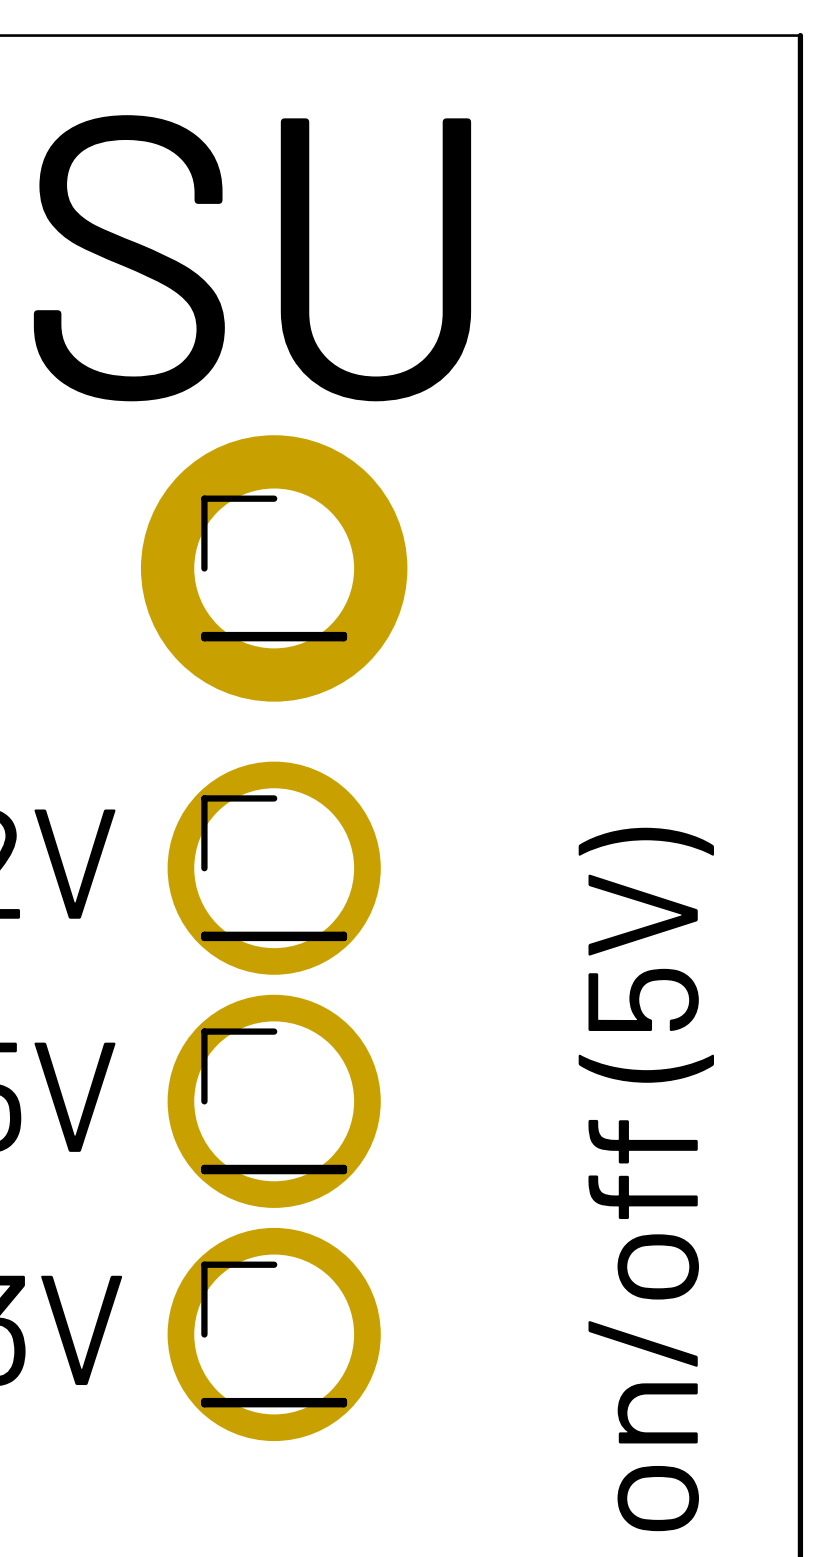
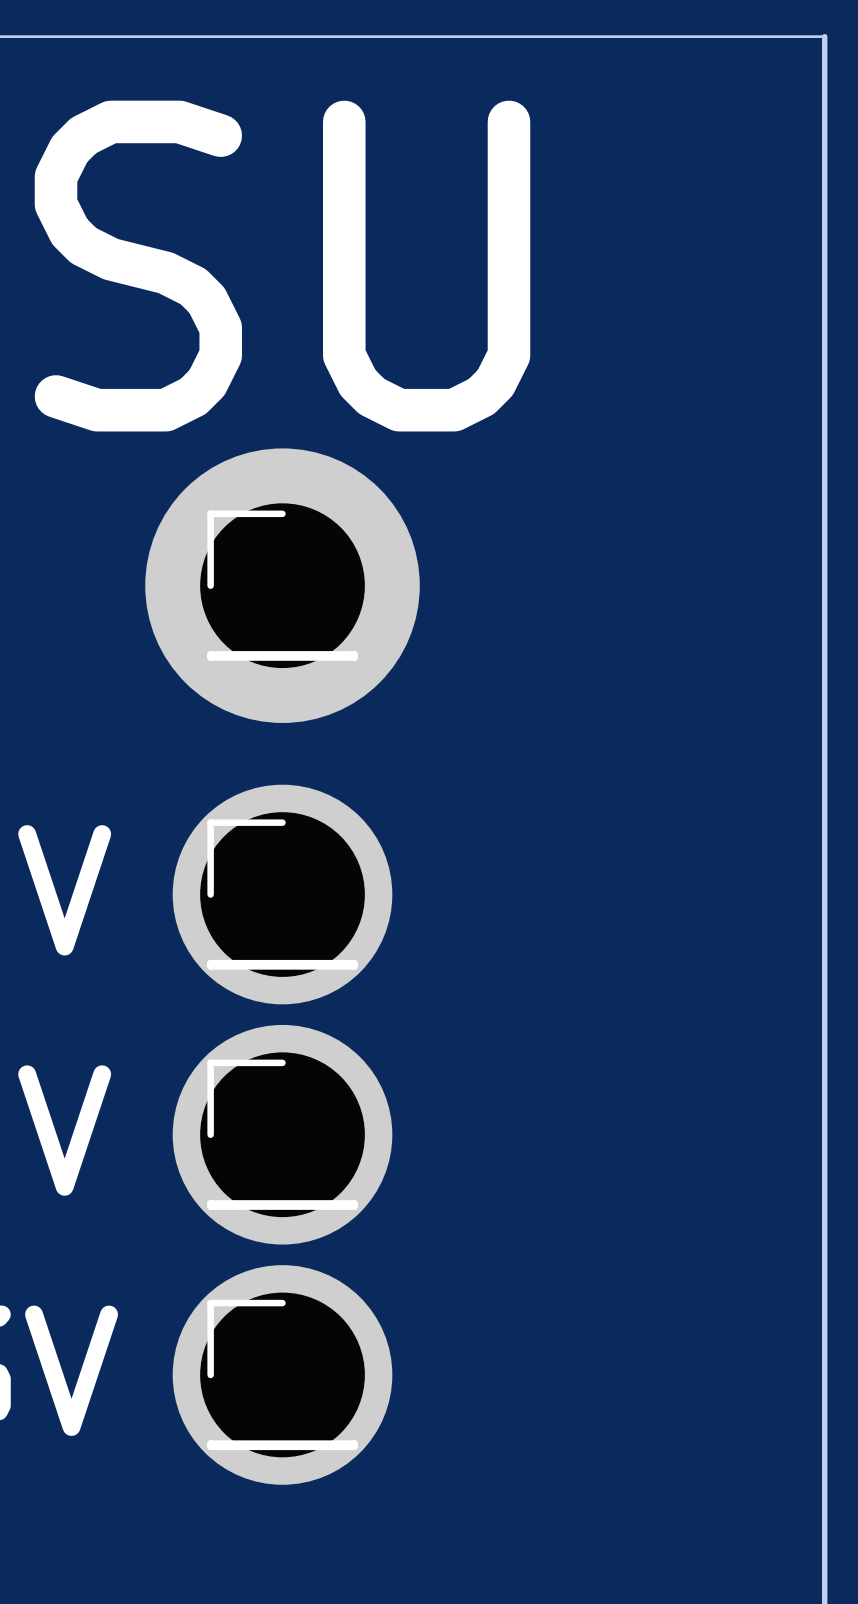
text: on/off (5V) (646, 1179) -> none

